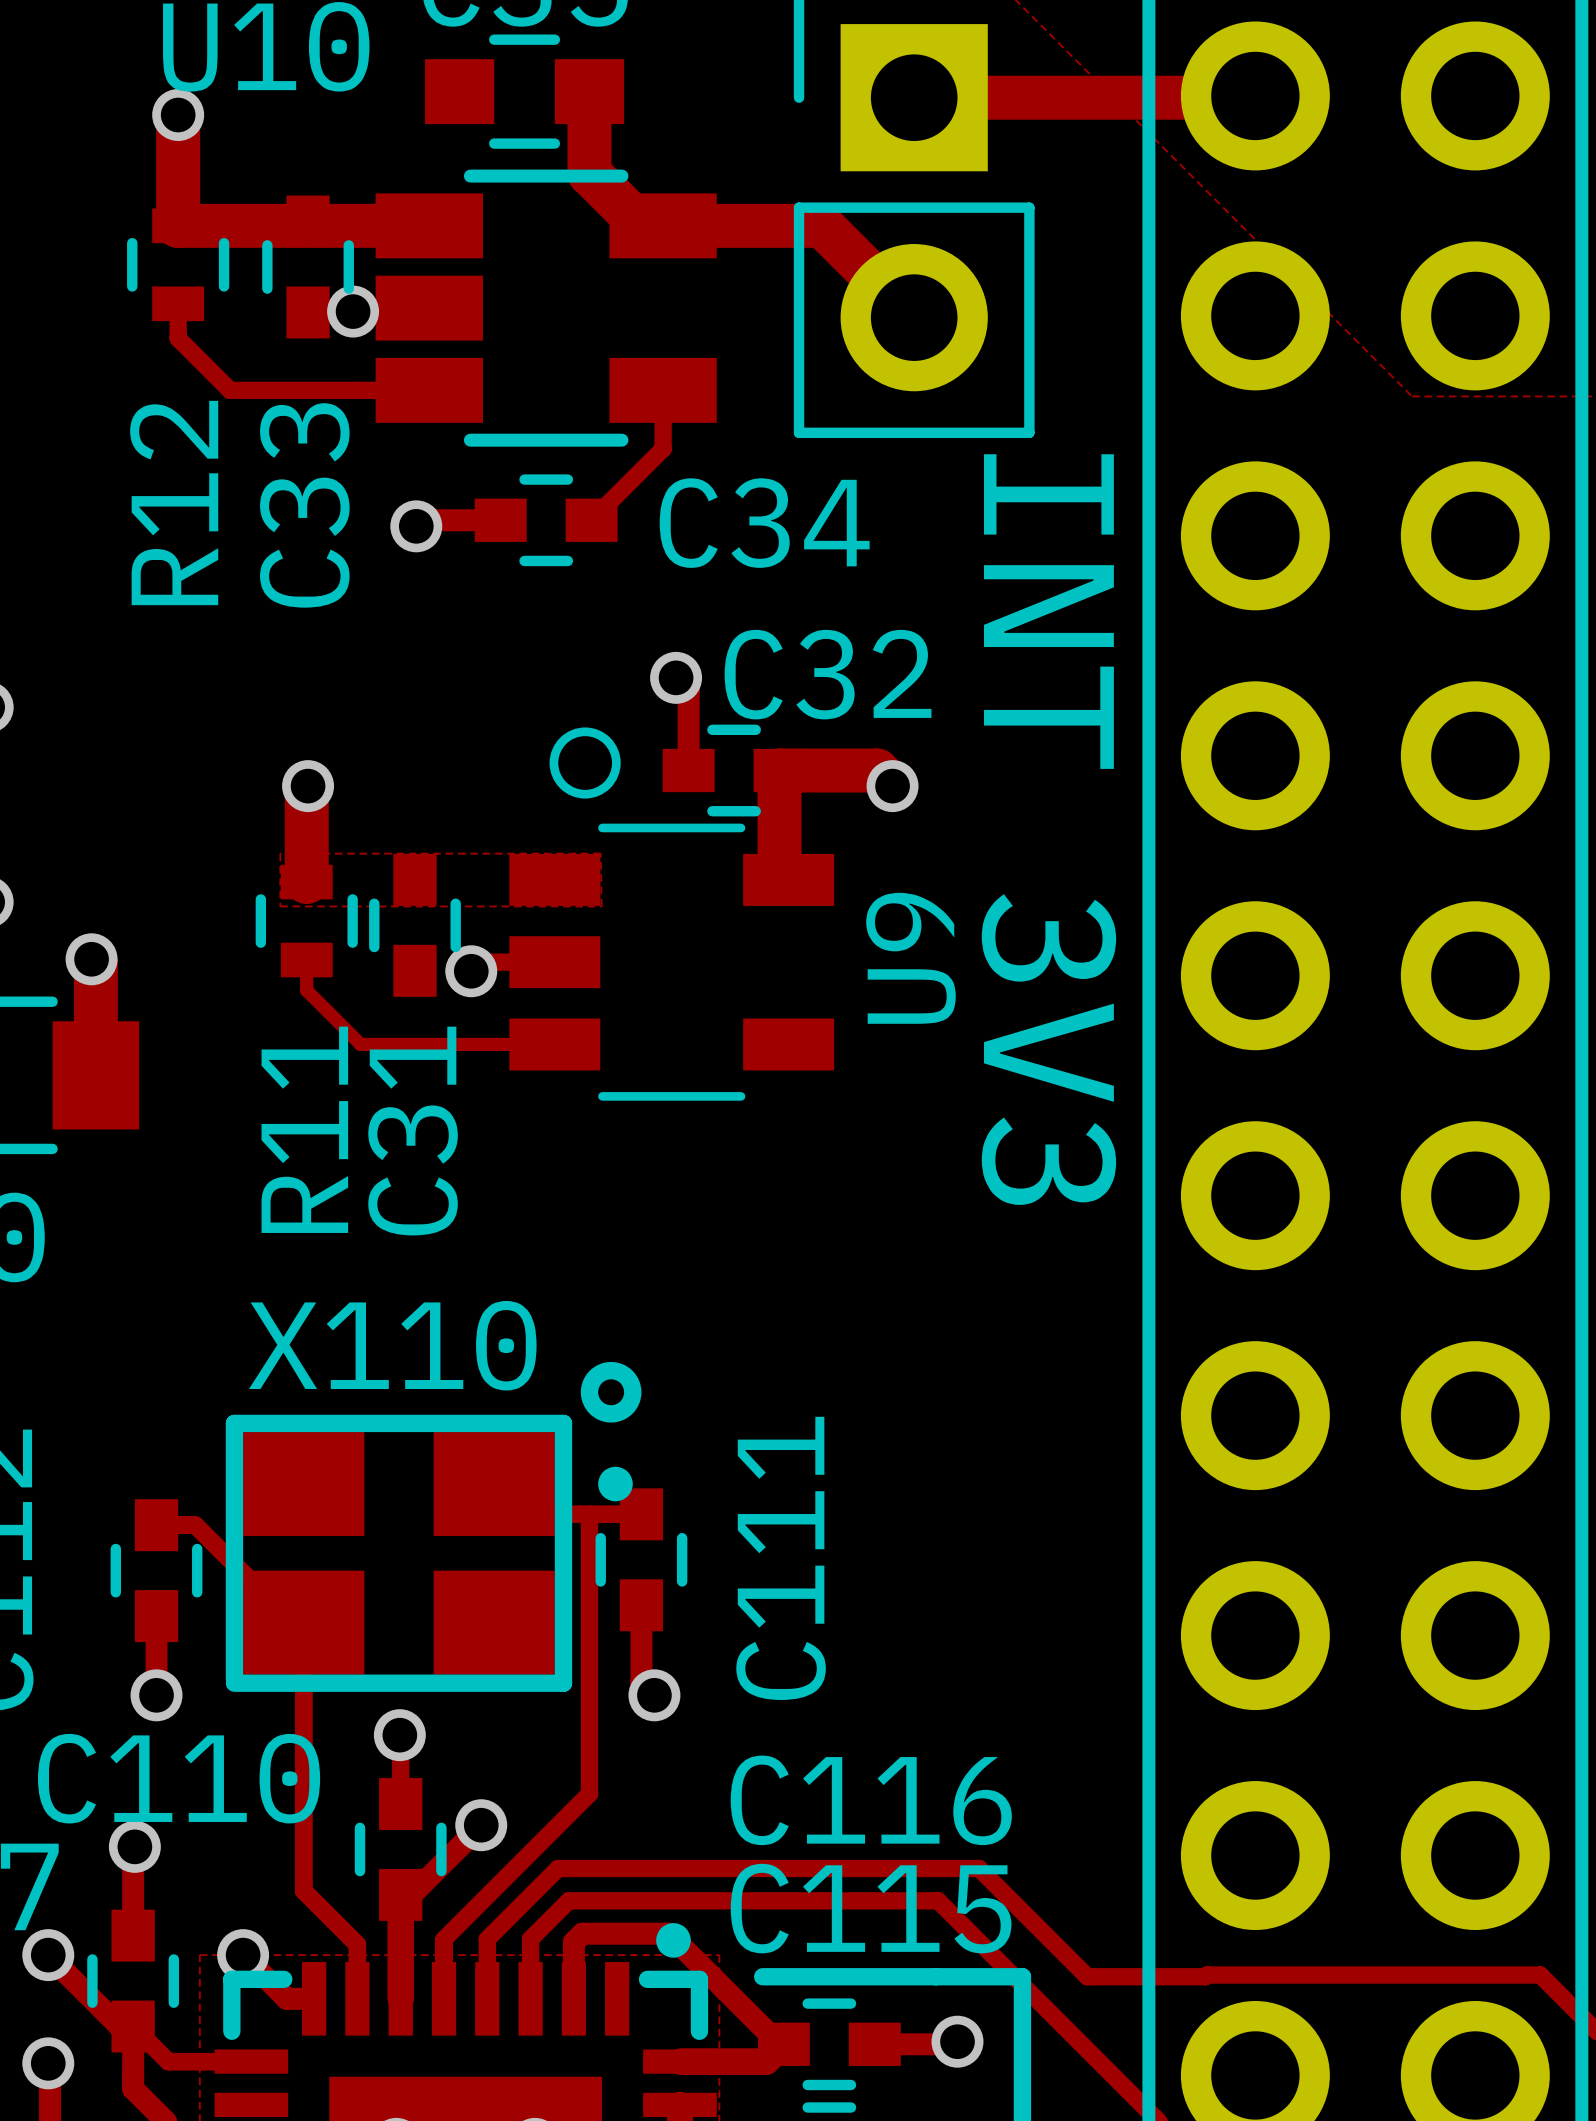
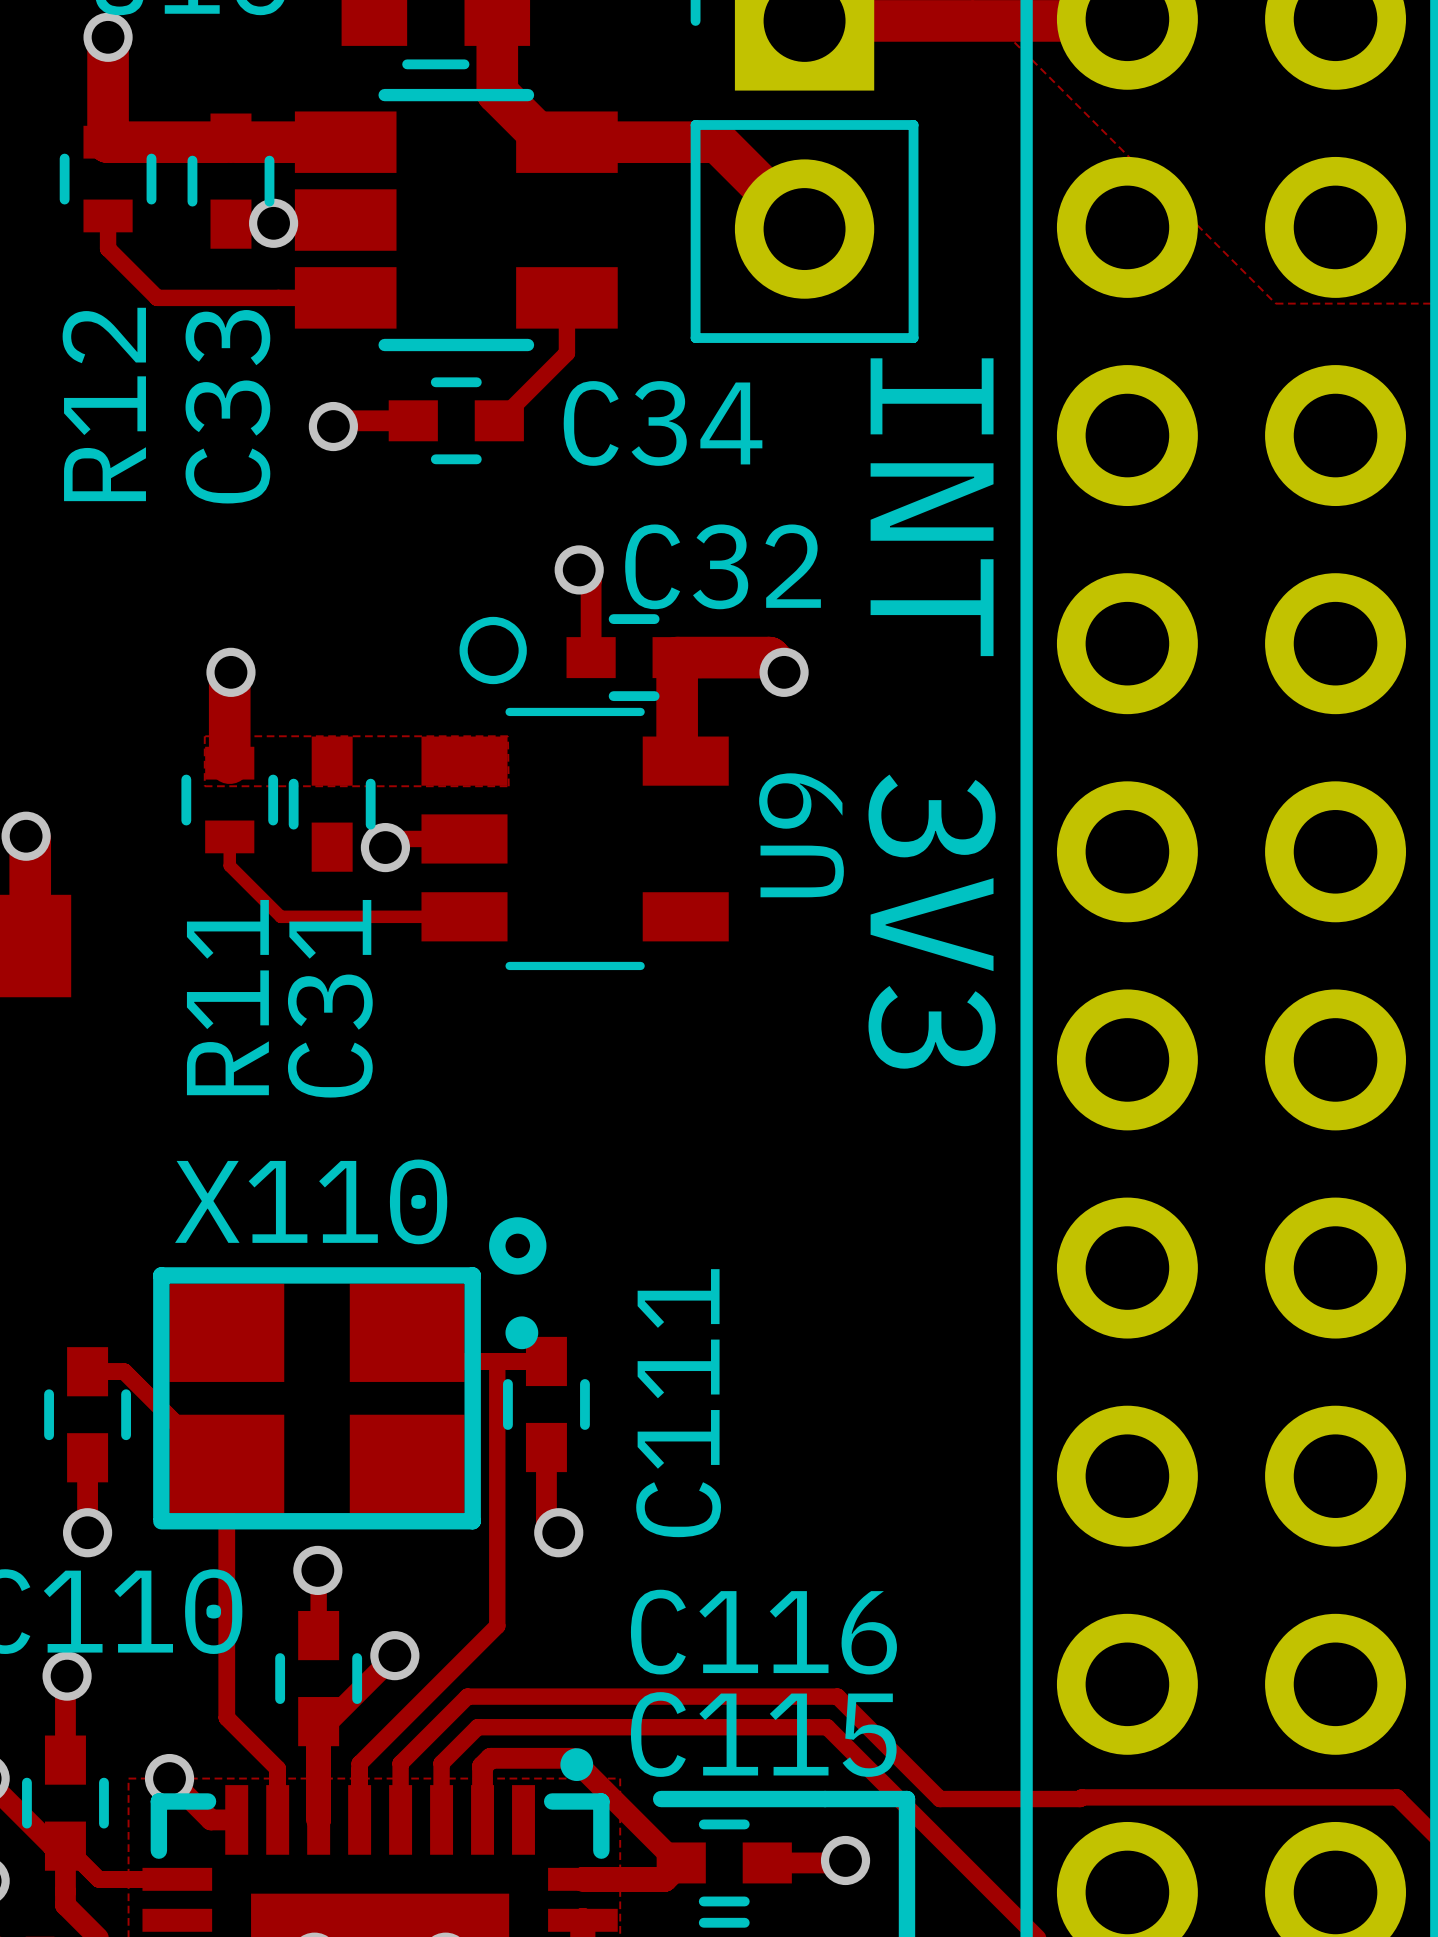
track: (949, 1868) (979, 1868) (1087, 1976) -> (837, 1696) (939, 1799) (968, 1799)

